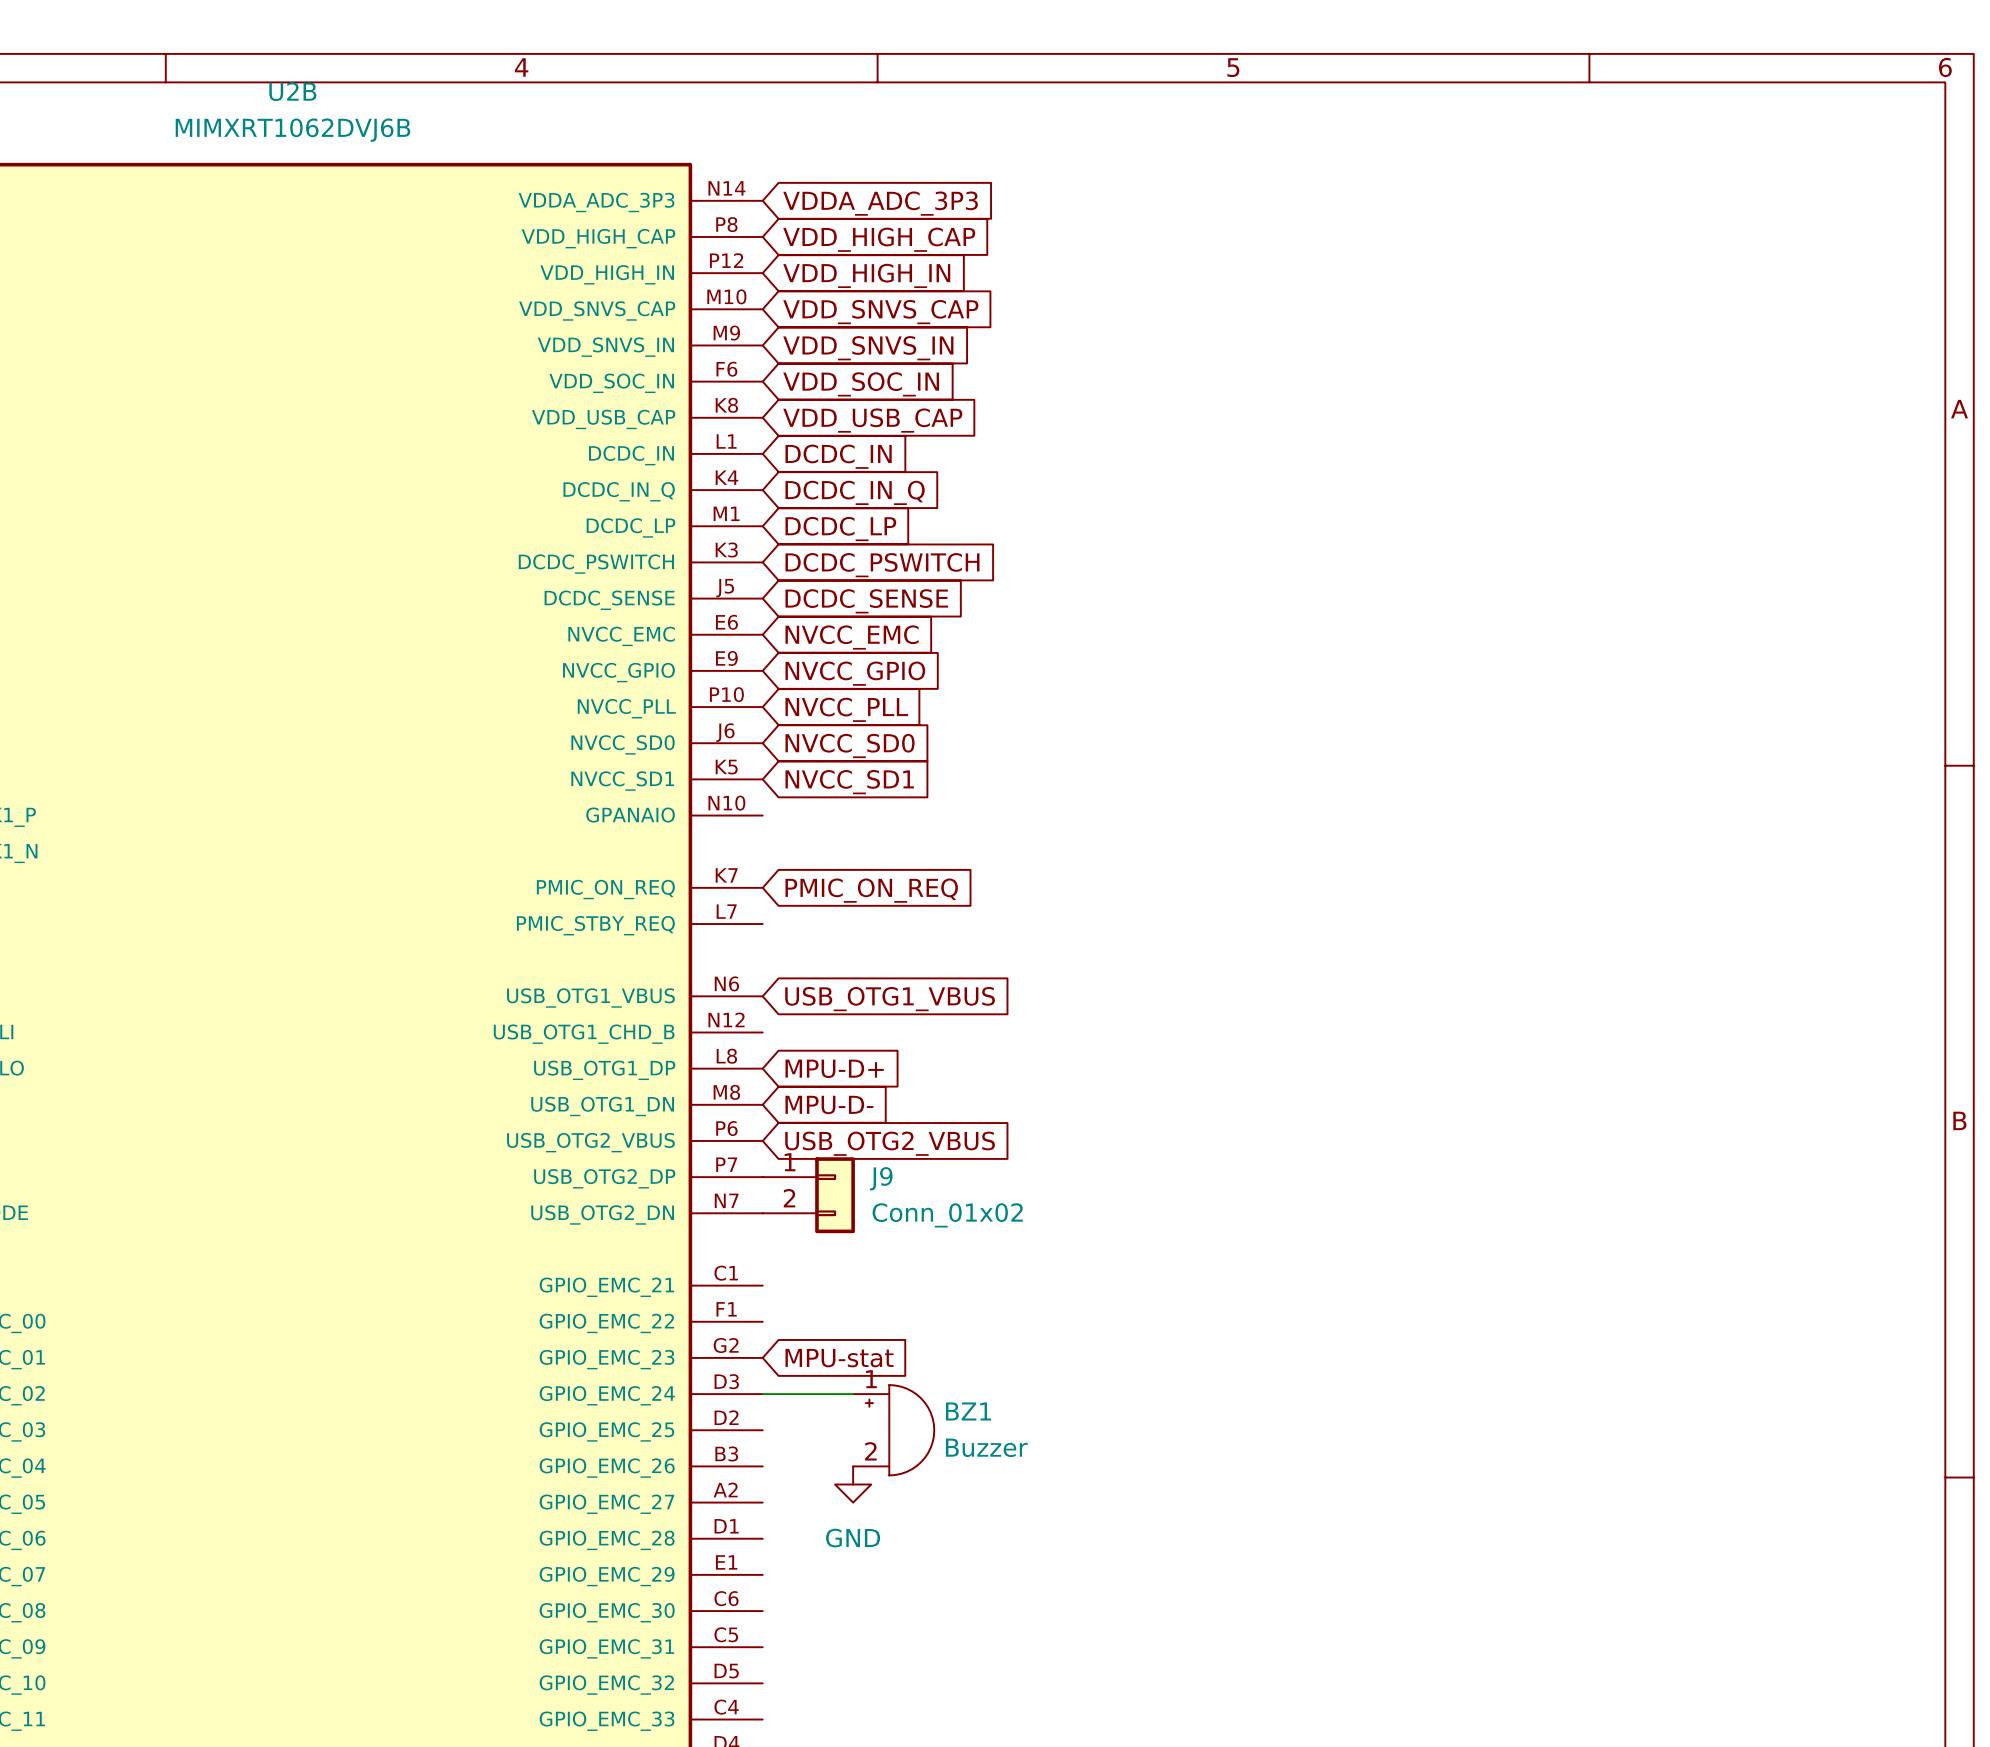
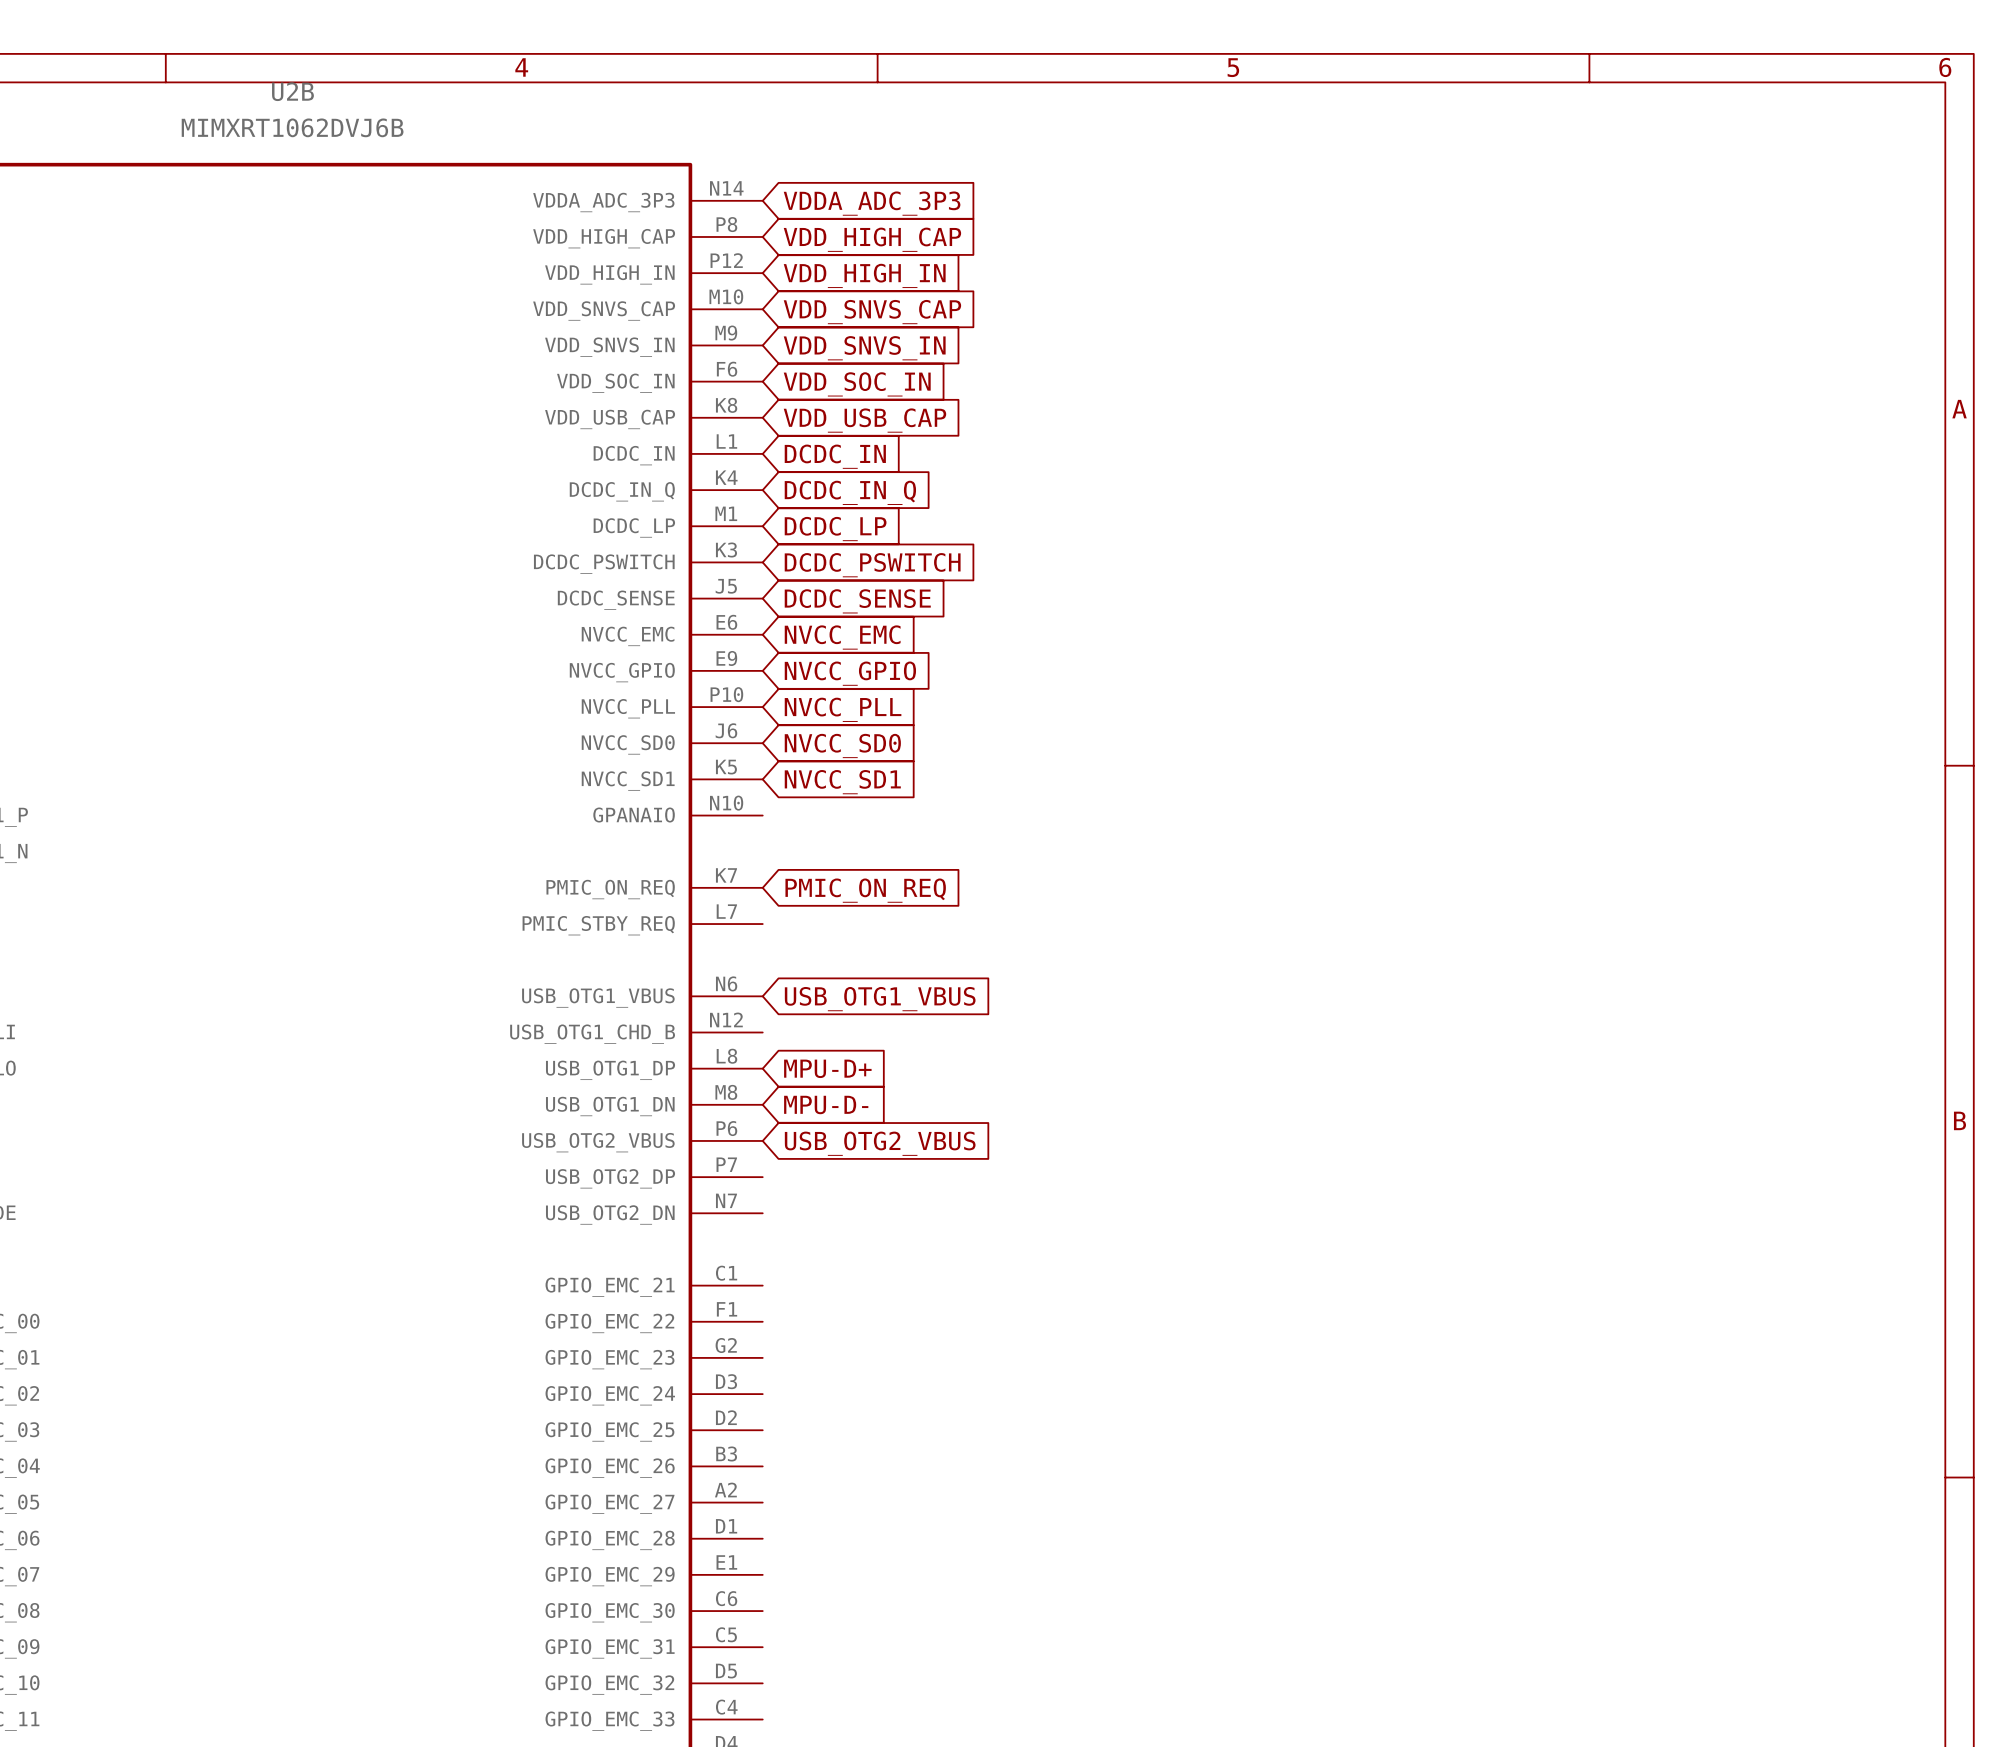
J9: Conn_01x02 (808, 1195) -> none
global label: MPU-stat (839, 1358) -> none
wire: (762, 1394) (853, 1394) -> none
BZ1: Buzzer (893, 1430) -> none
power symbol: GND (853, 1484) -> none

